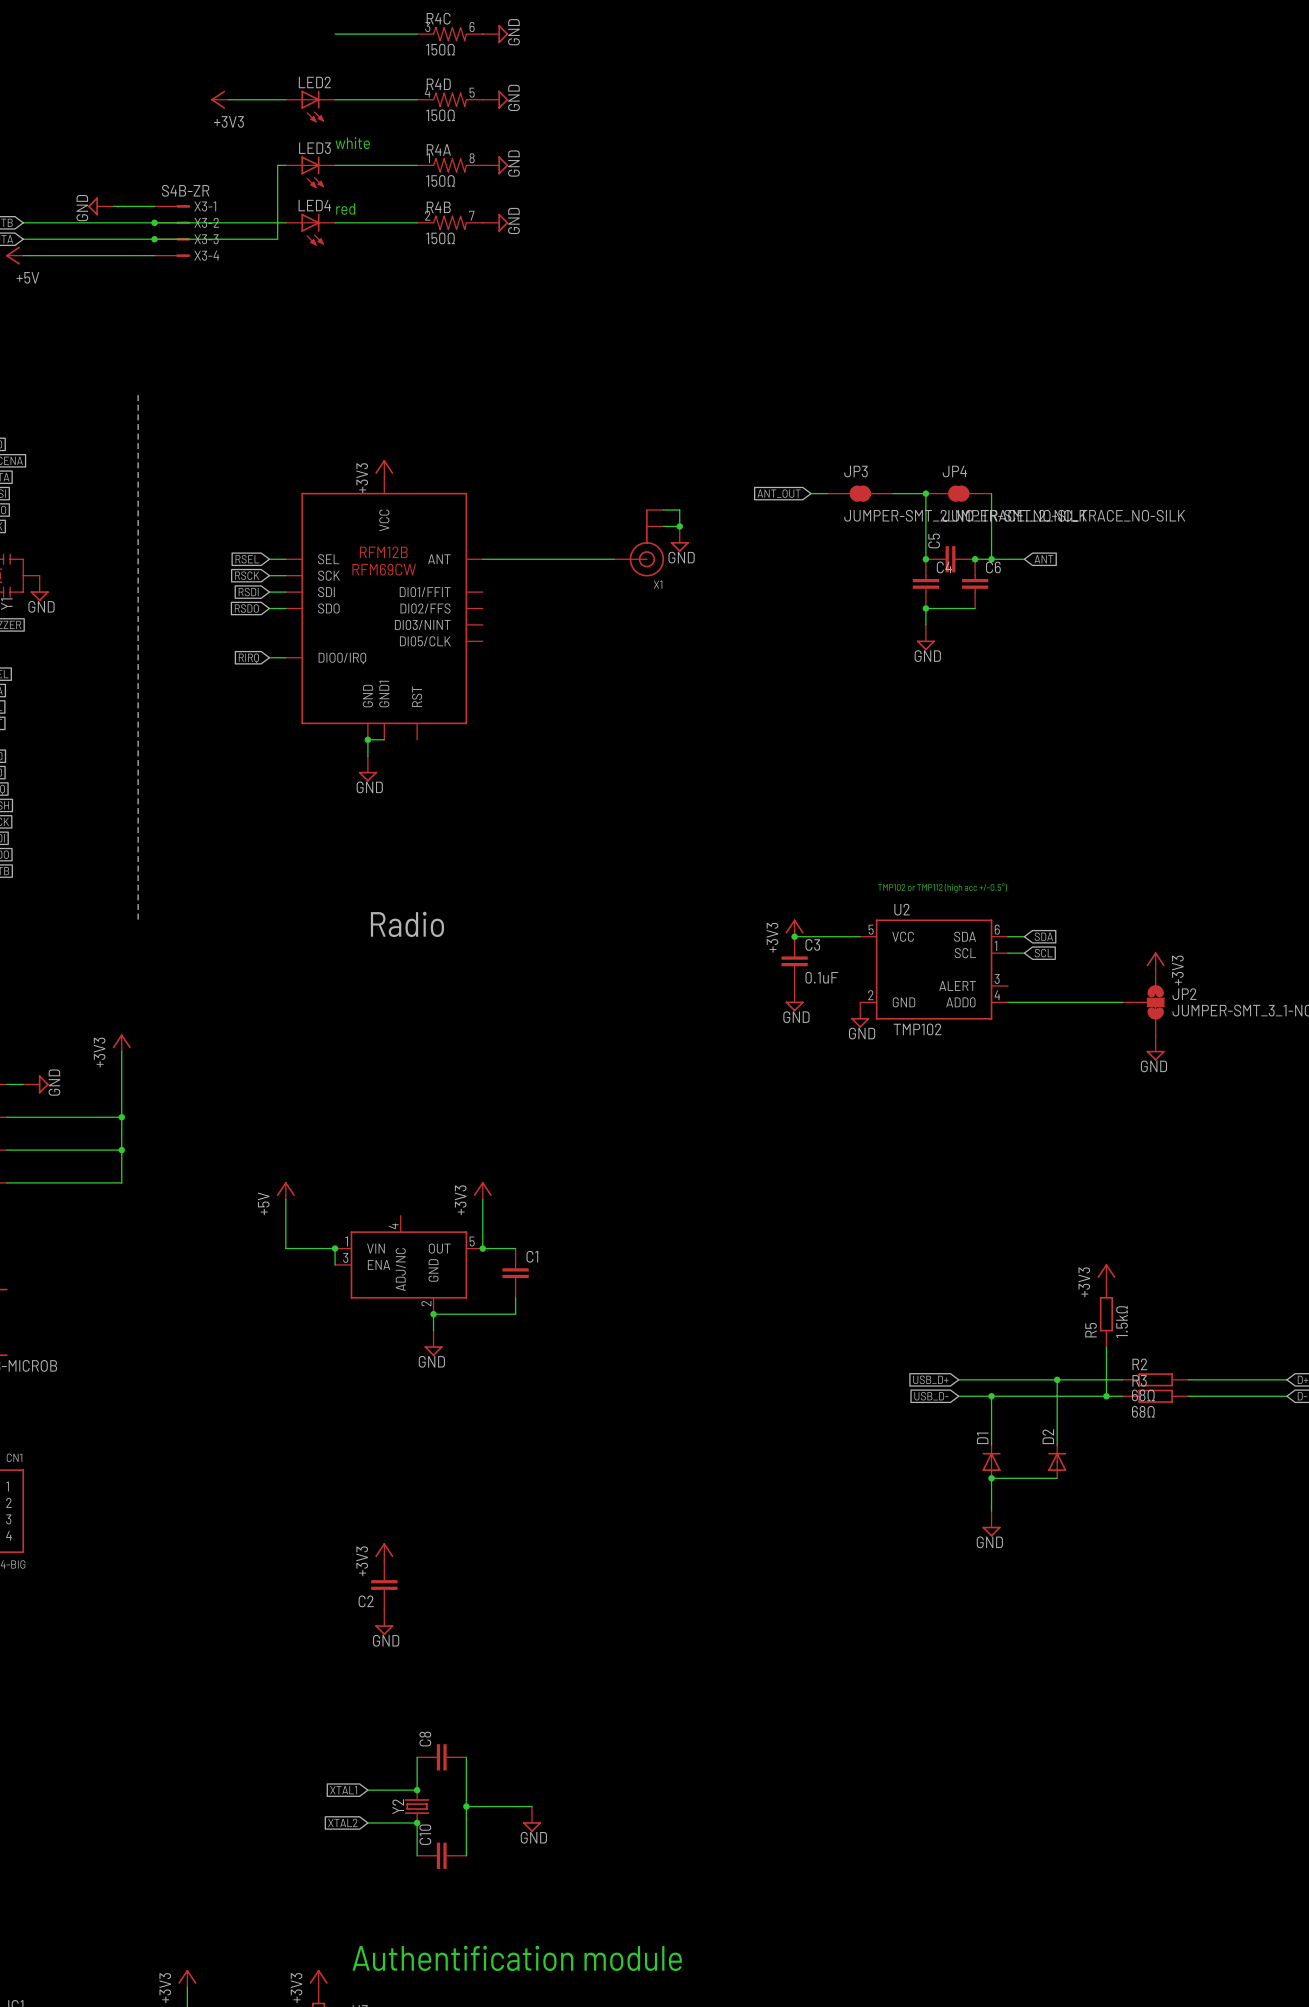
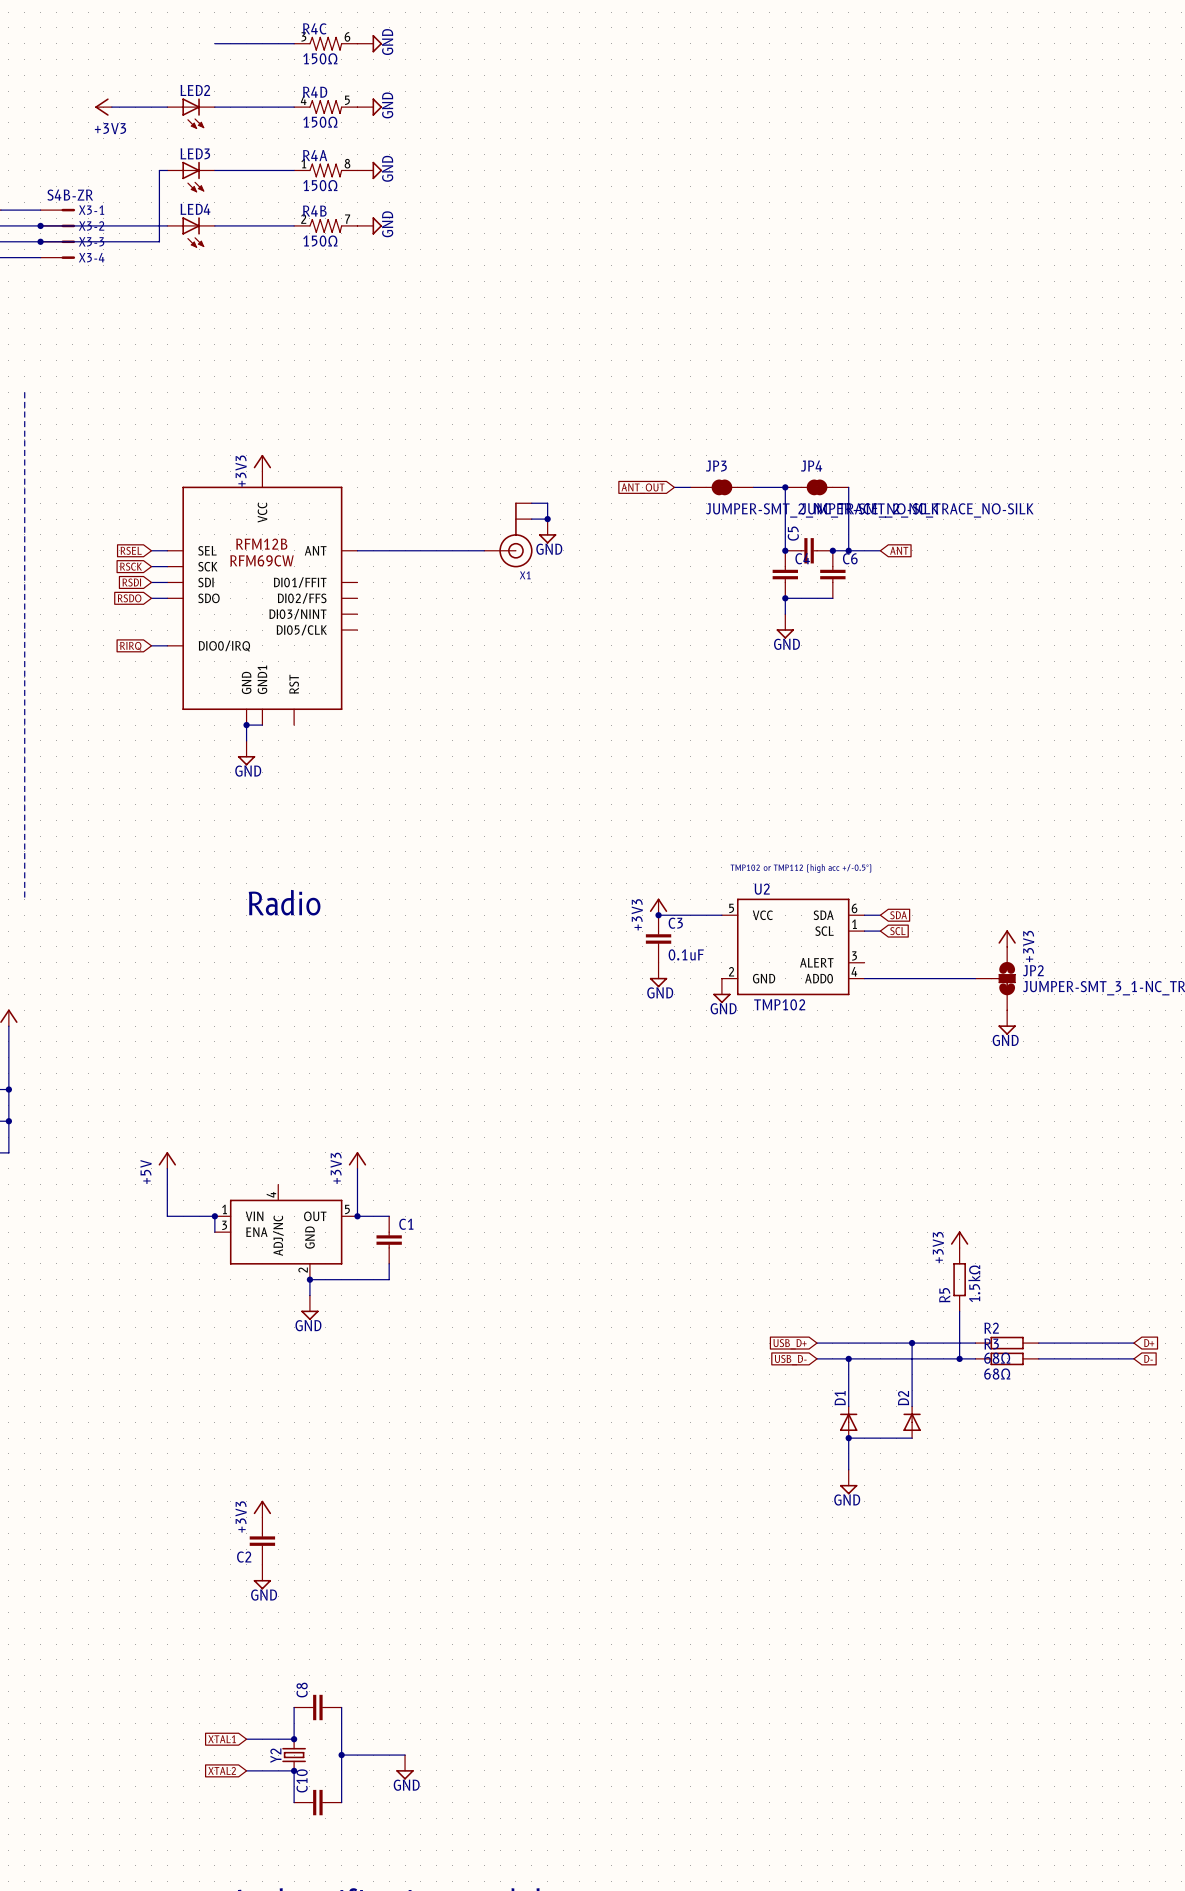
text: white (352, 143) -> none
text: red (345, 208) -> none

